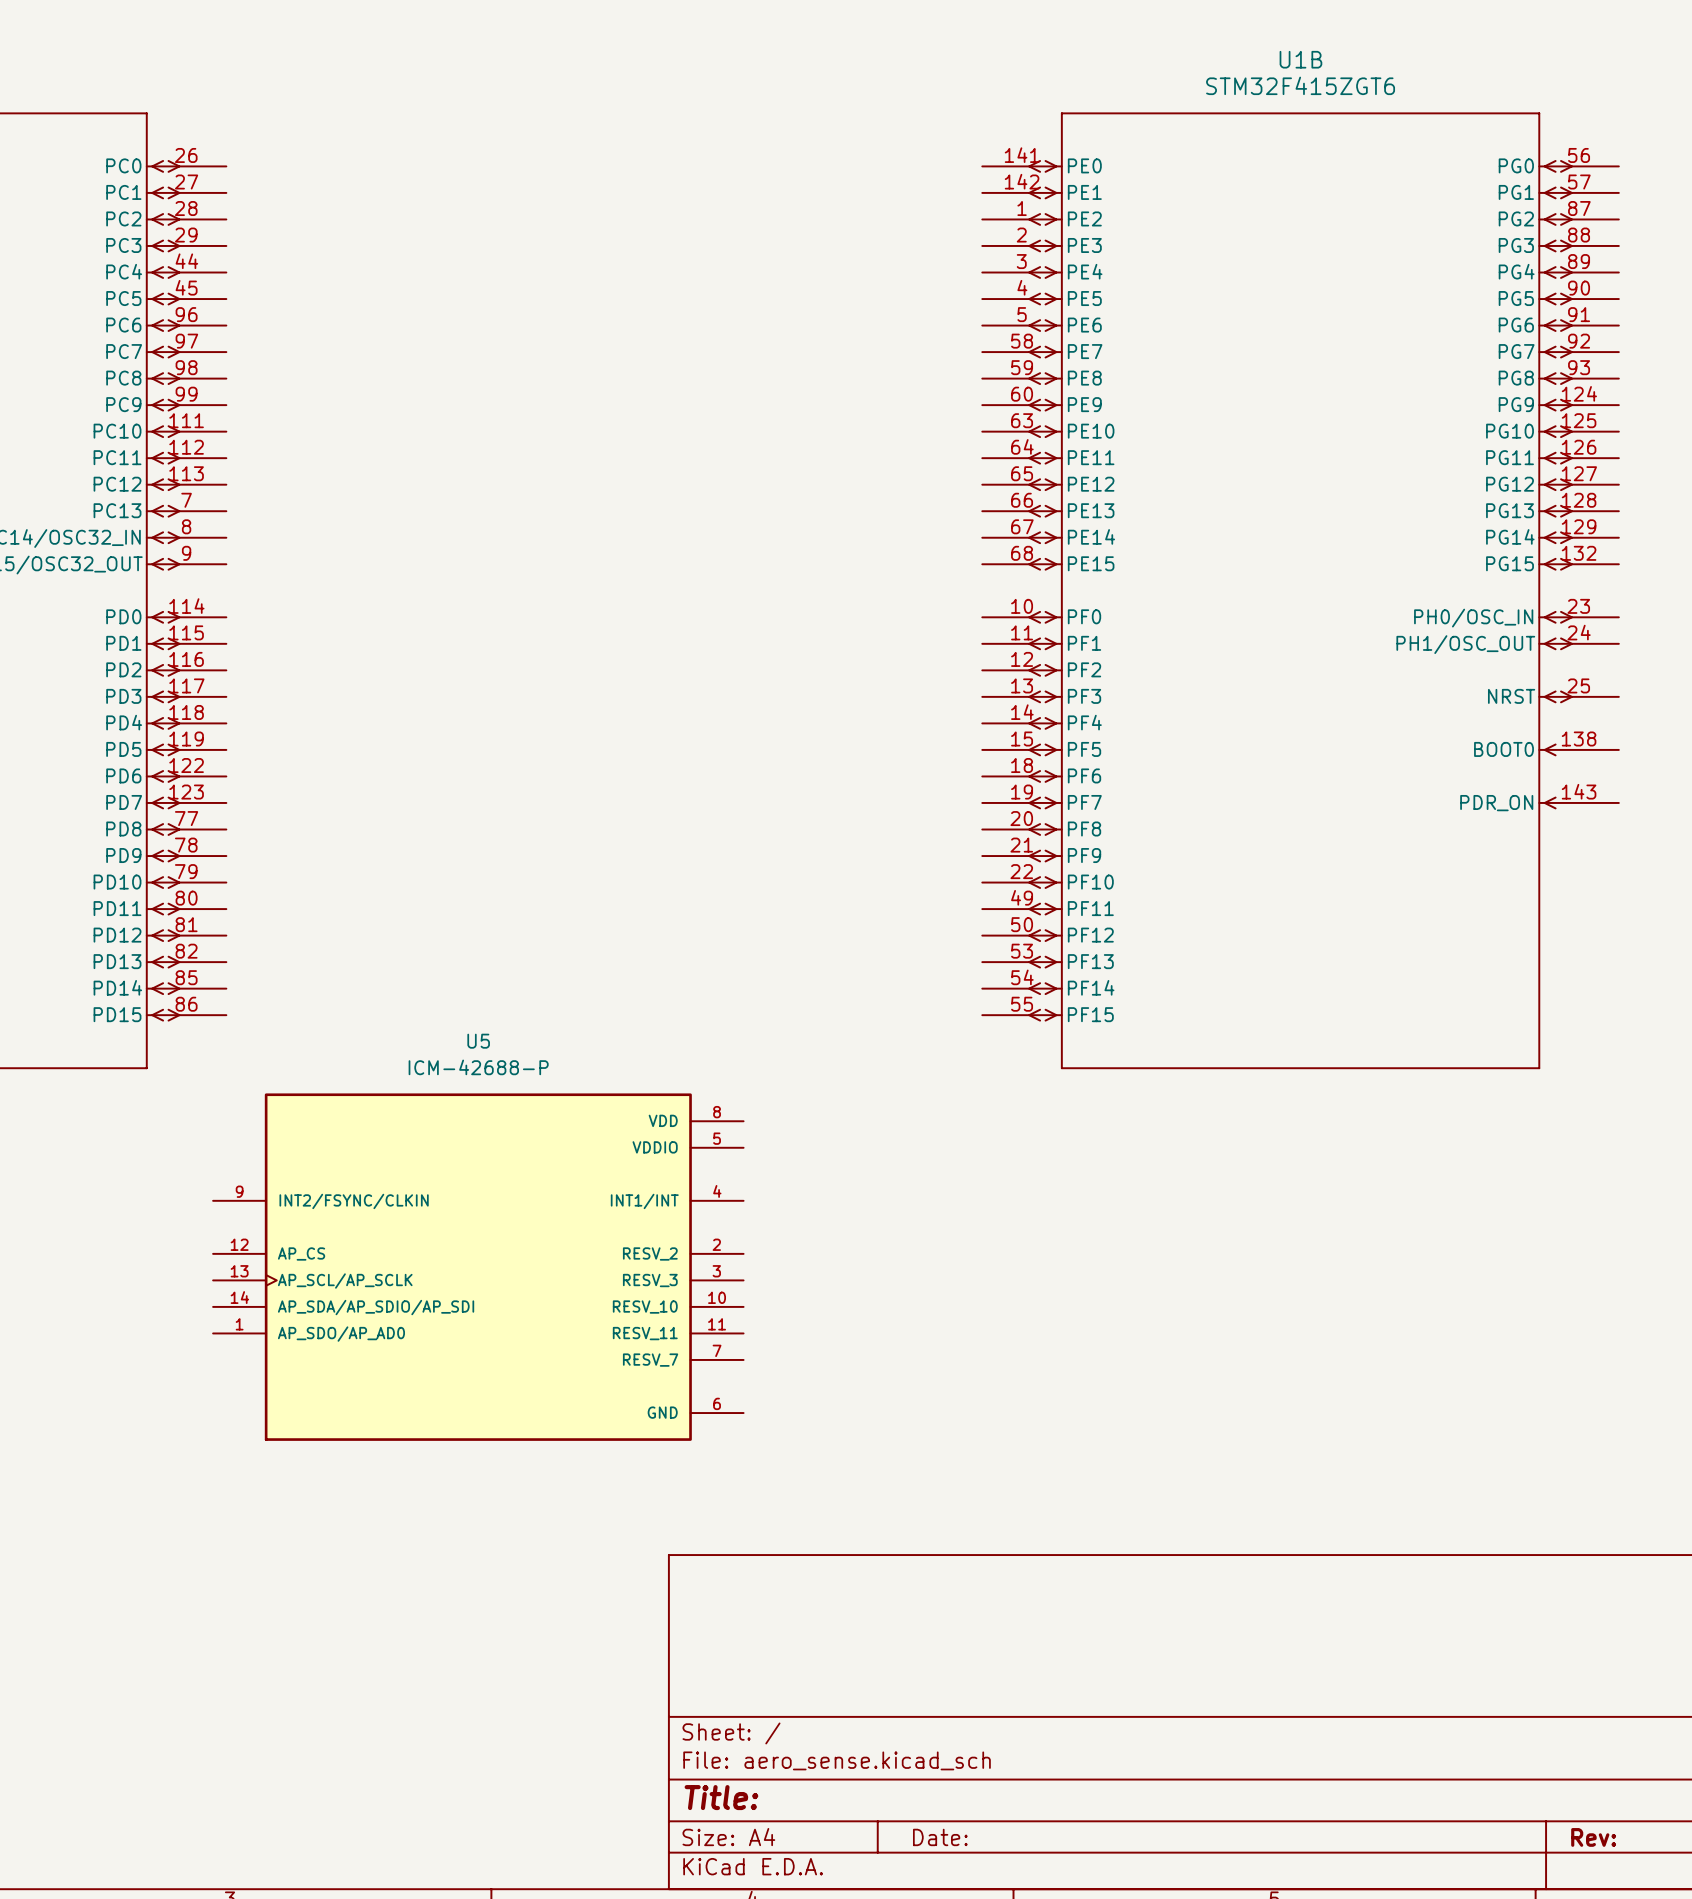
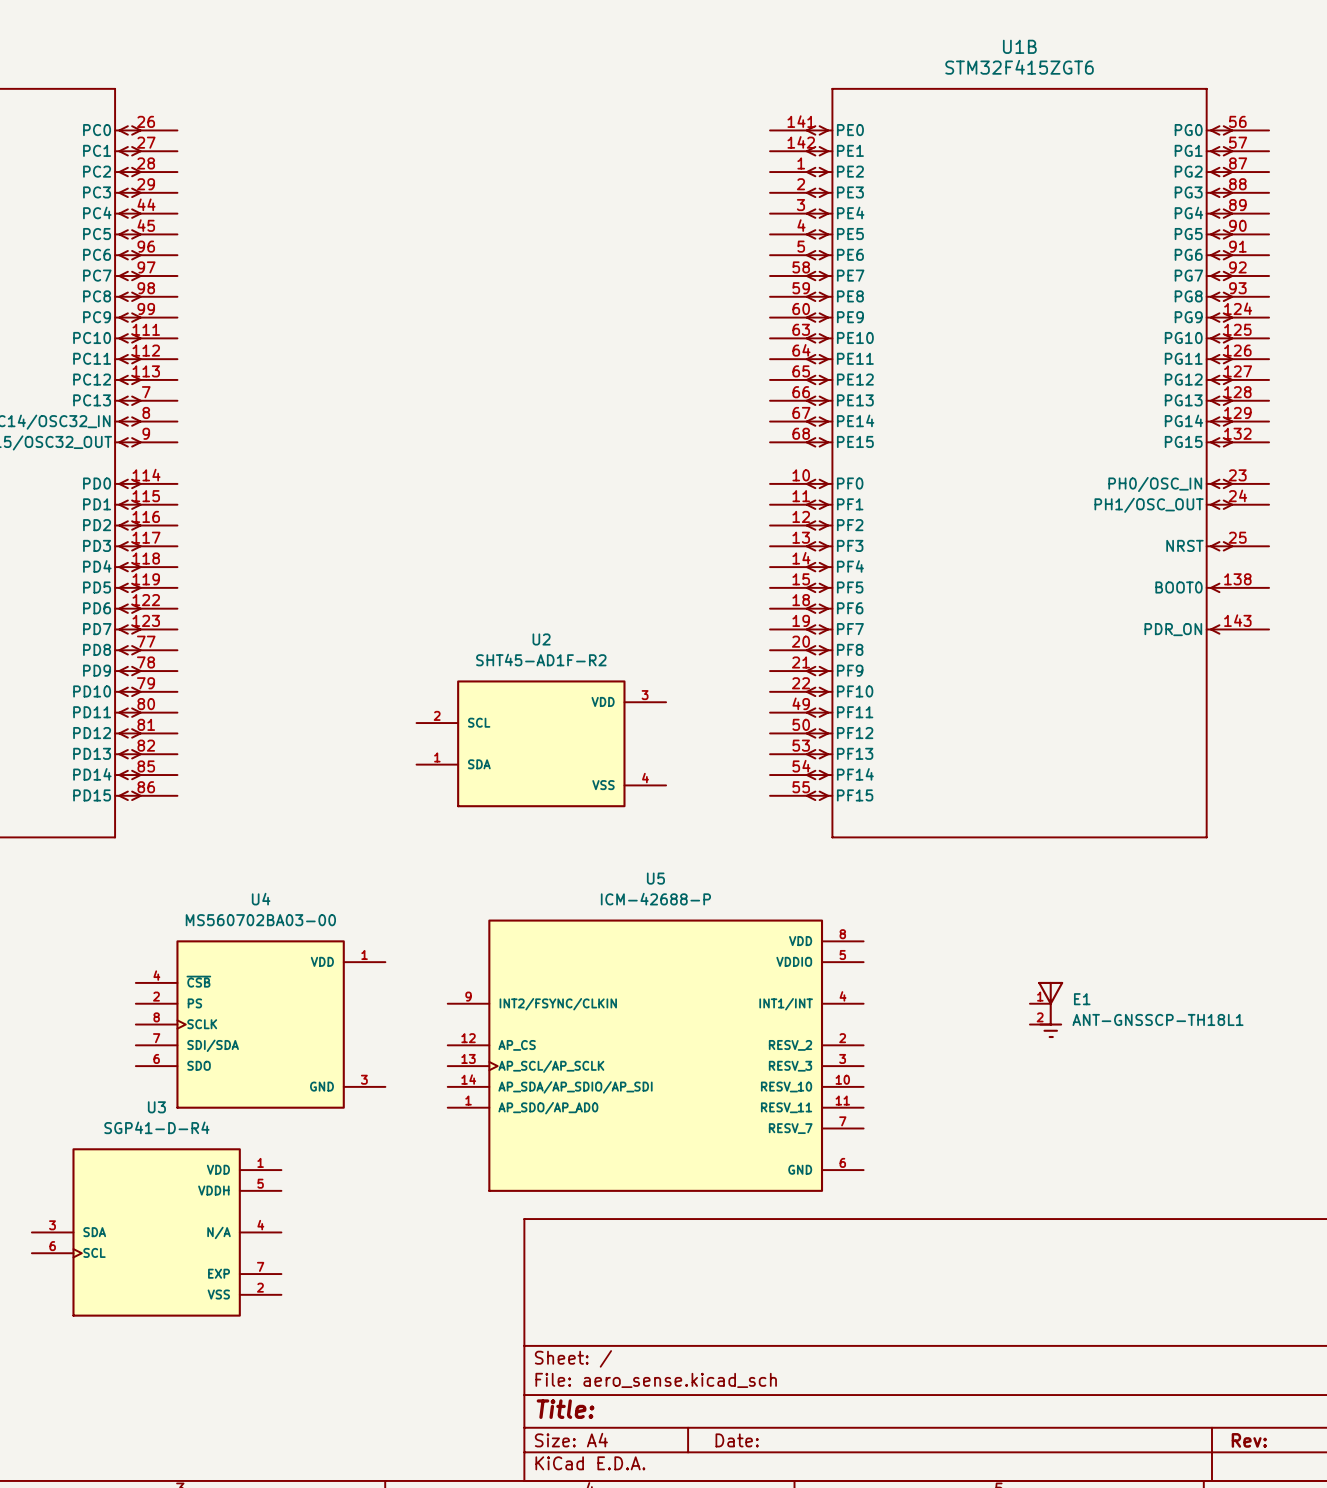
U2: none -> SHT45-AD1F-R2 (541, 743)
U5 position: (478, 1267) -> (655, 1055)
E1: none -> ANT-GNSSCP-TH18L1 (1046, 1009)
U4: none -> MS560702BA03-00 (260, 1024)
U3: none -> SGP41-D-R4 (156, 1232)

